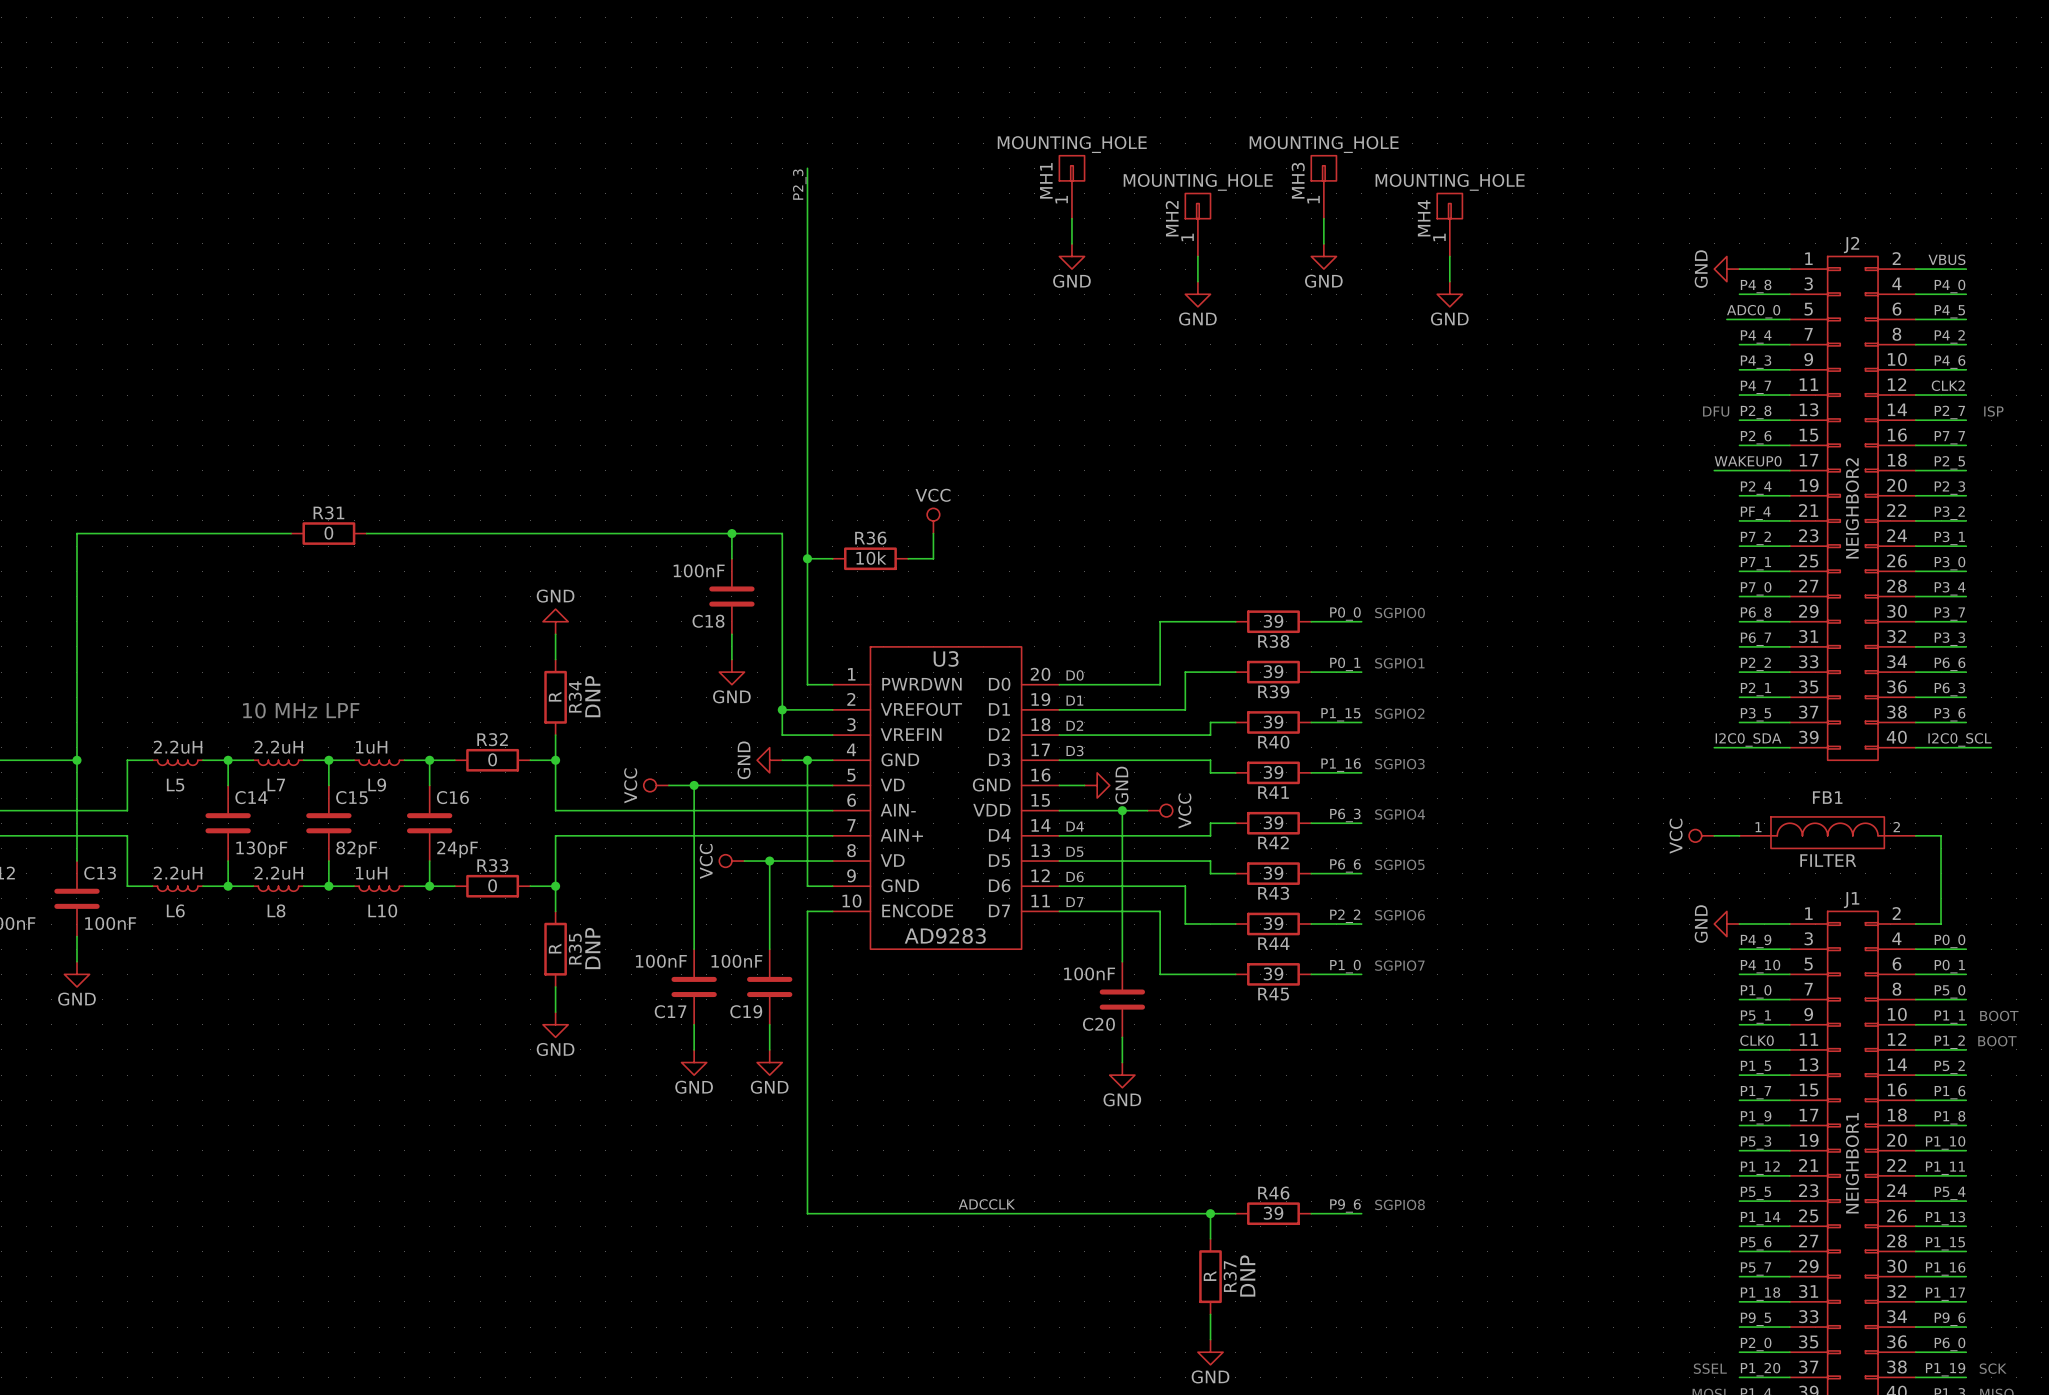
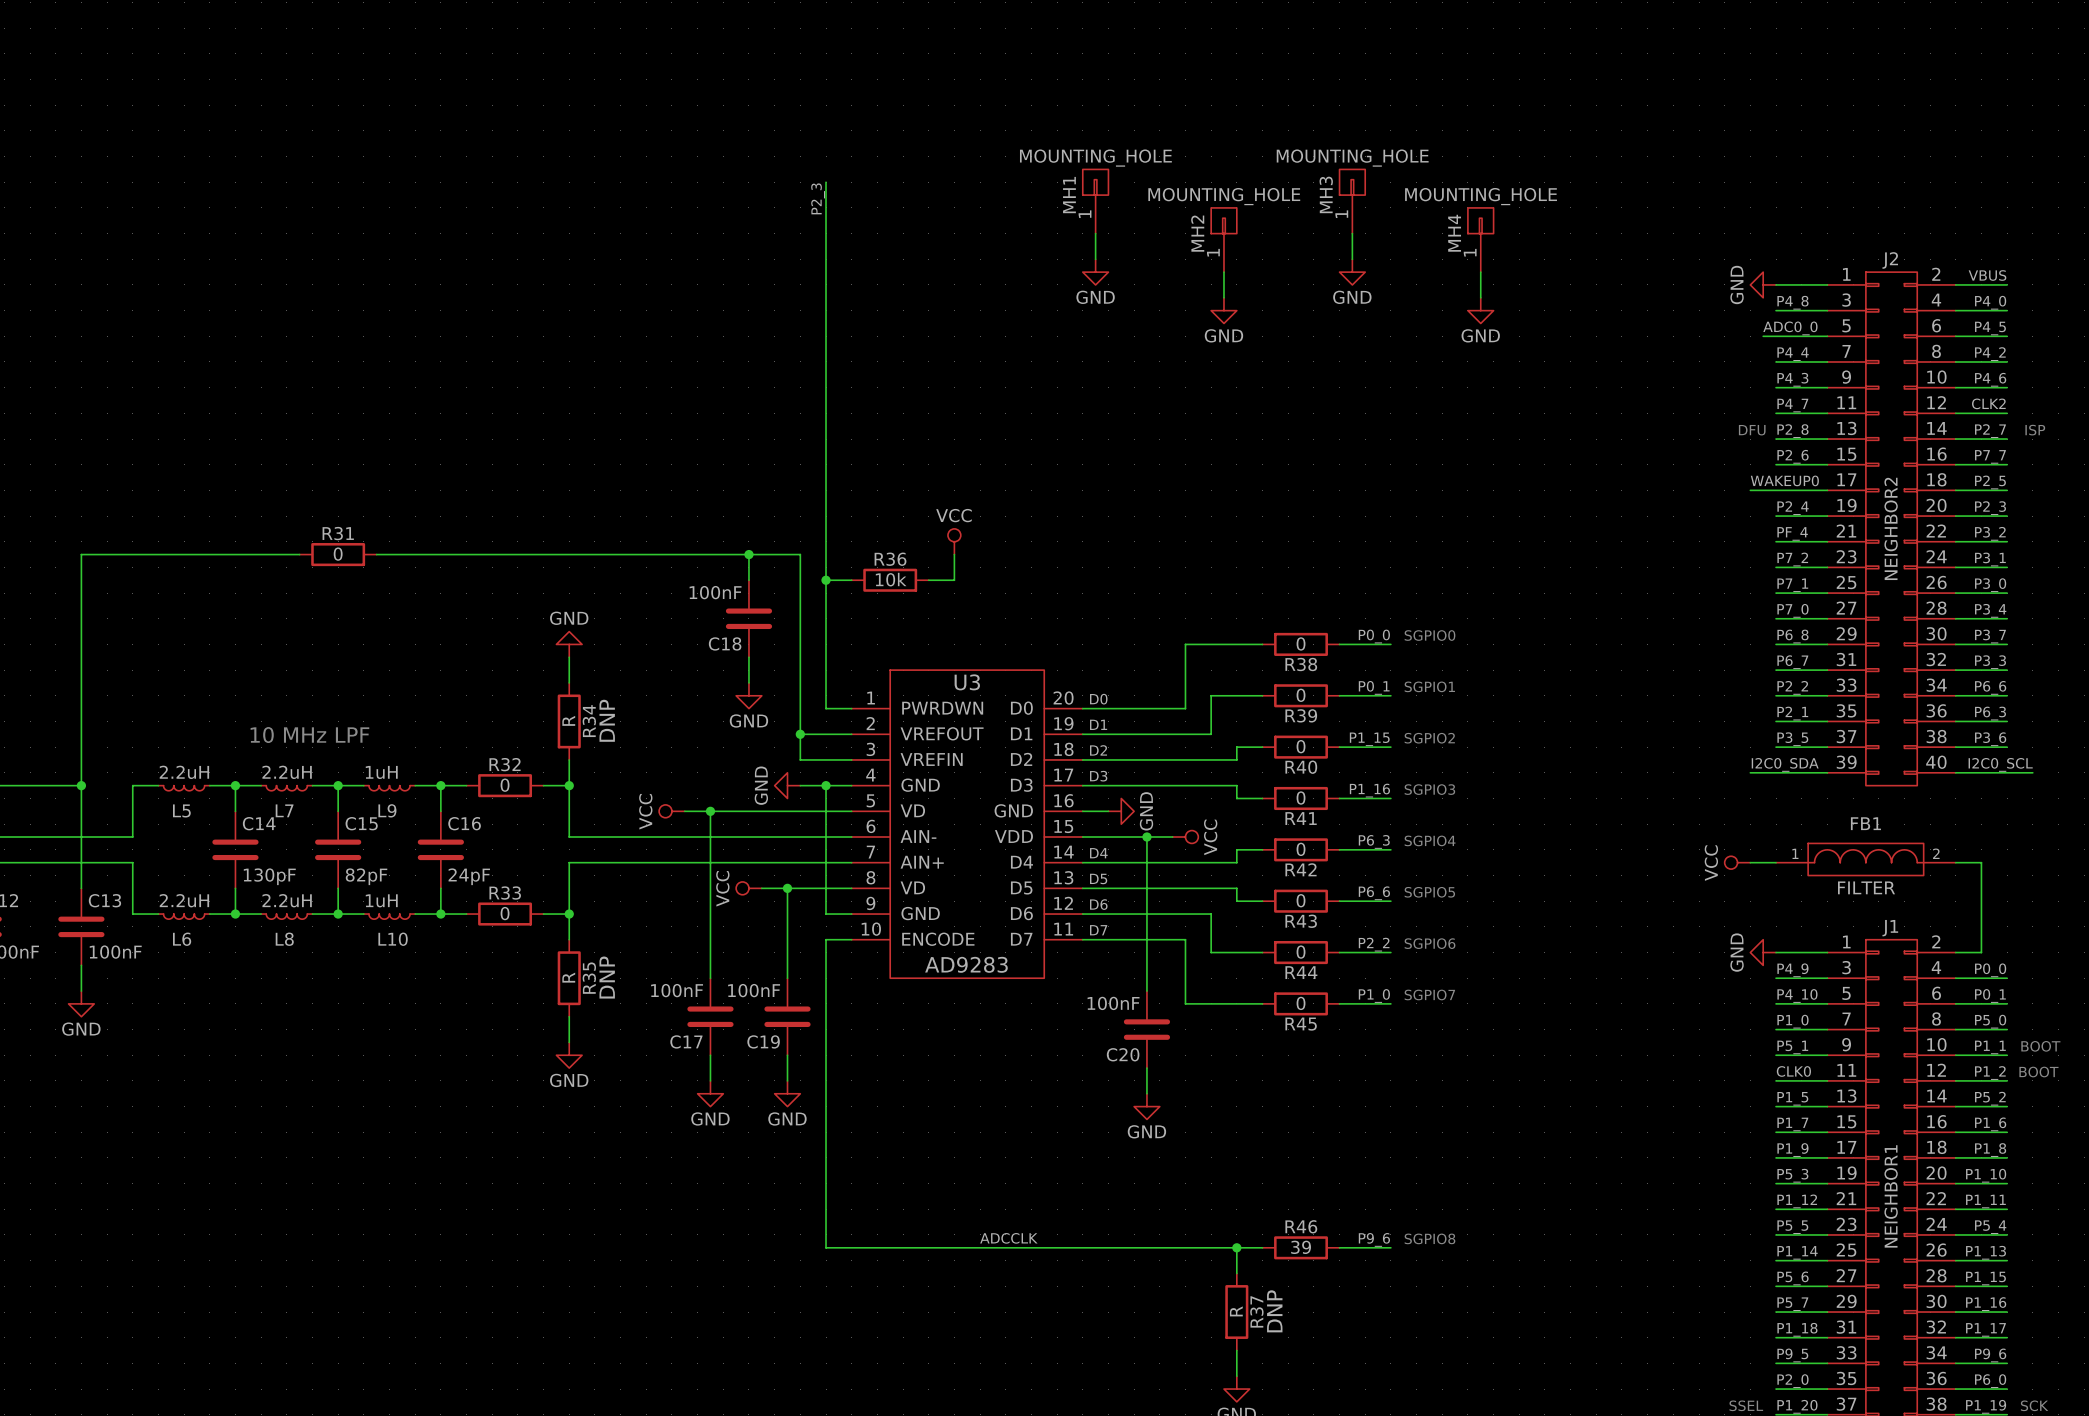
R38 value: 39 (1273, 621) -> 0 (1301, 643)
R39 value: 39 (1273, 671) -> 0 (1301, 695)
R40 value: 39 (1273, 722) -> 0 (1301, 746)
R41 value: 39 (1273, 772) -> 0 (1301, 798)
R42 value: 39 (1273, 822) -> 0 (1301, 849)
R43 value: 39 (1273, 873) -> 0 (1301, 900)
R44 value: 39 (1273, 923) -> 0 (1301, 952)
R45 value: 39 (1273, 973) -> 0 (1301, 1003)

